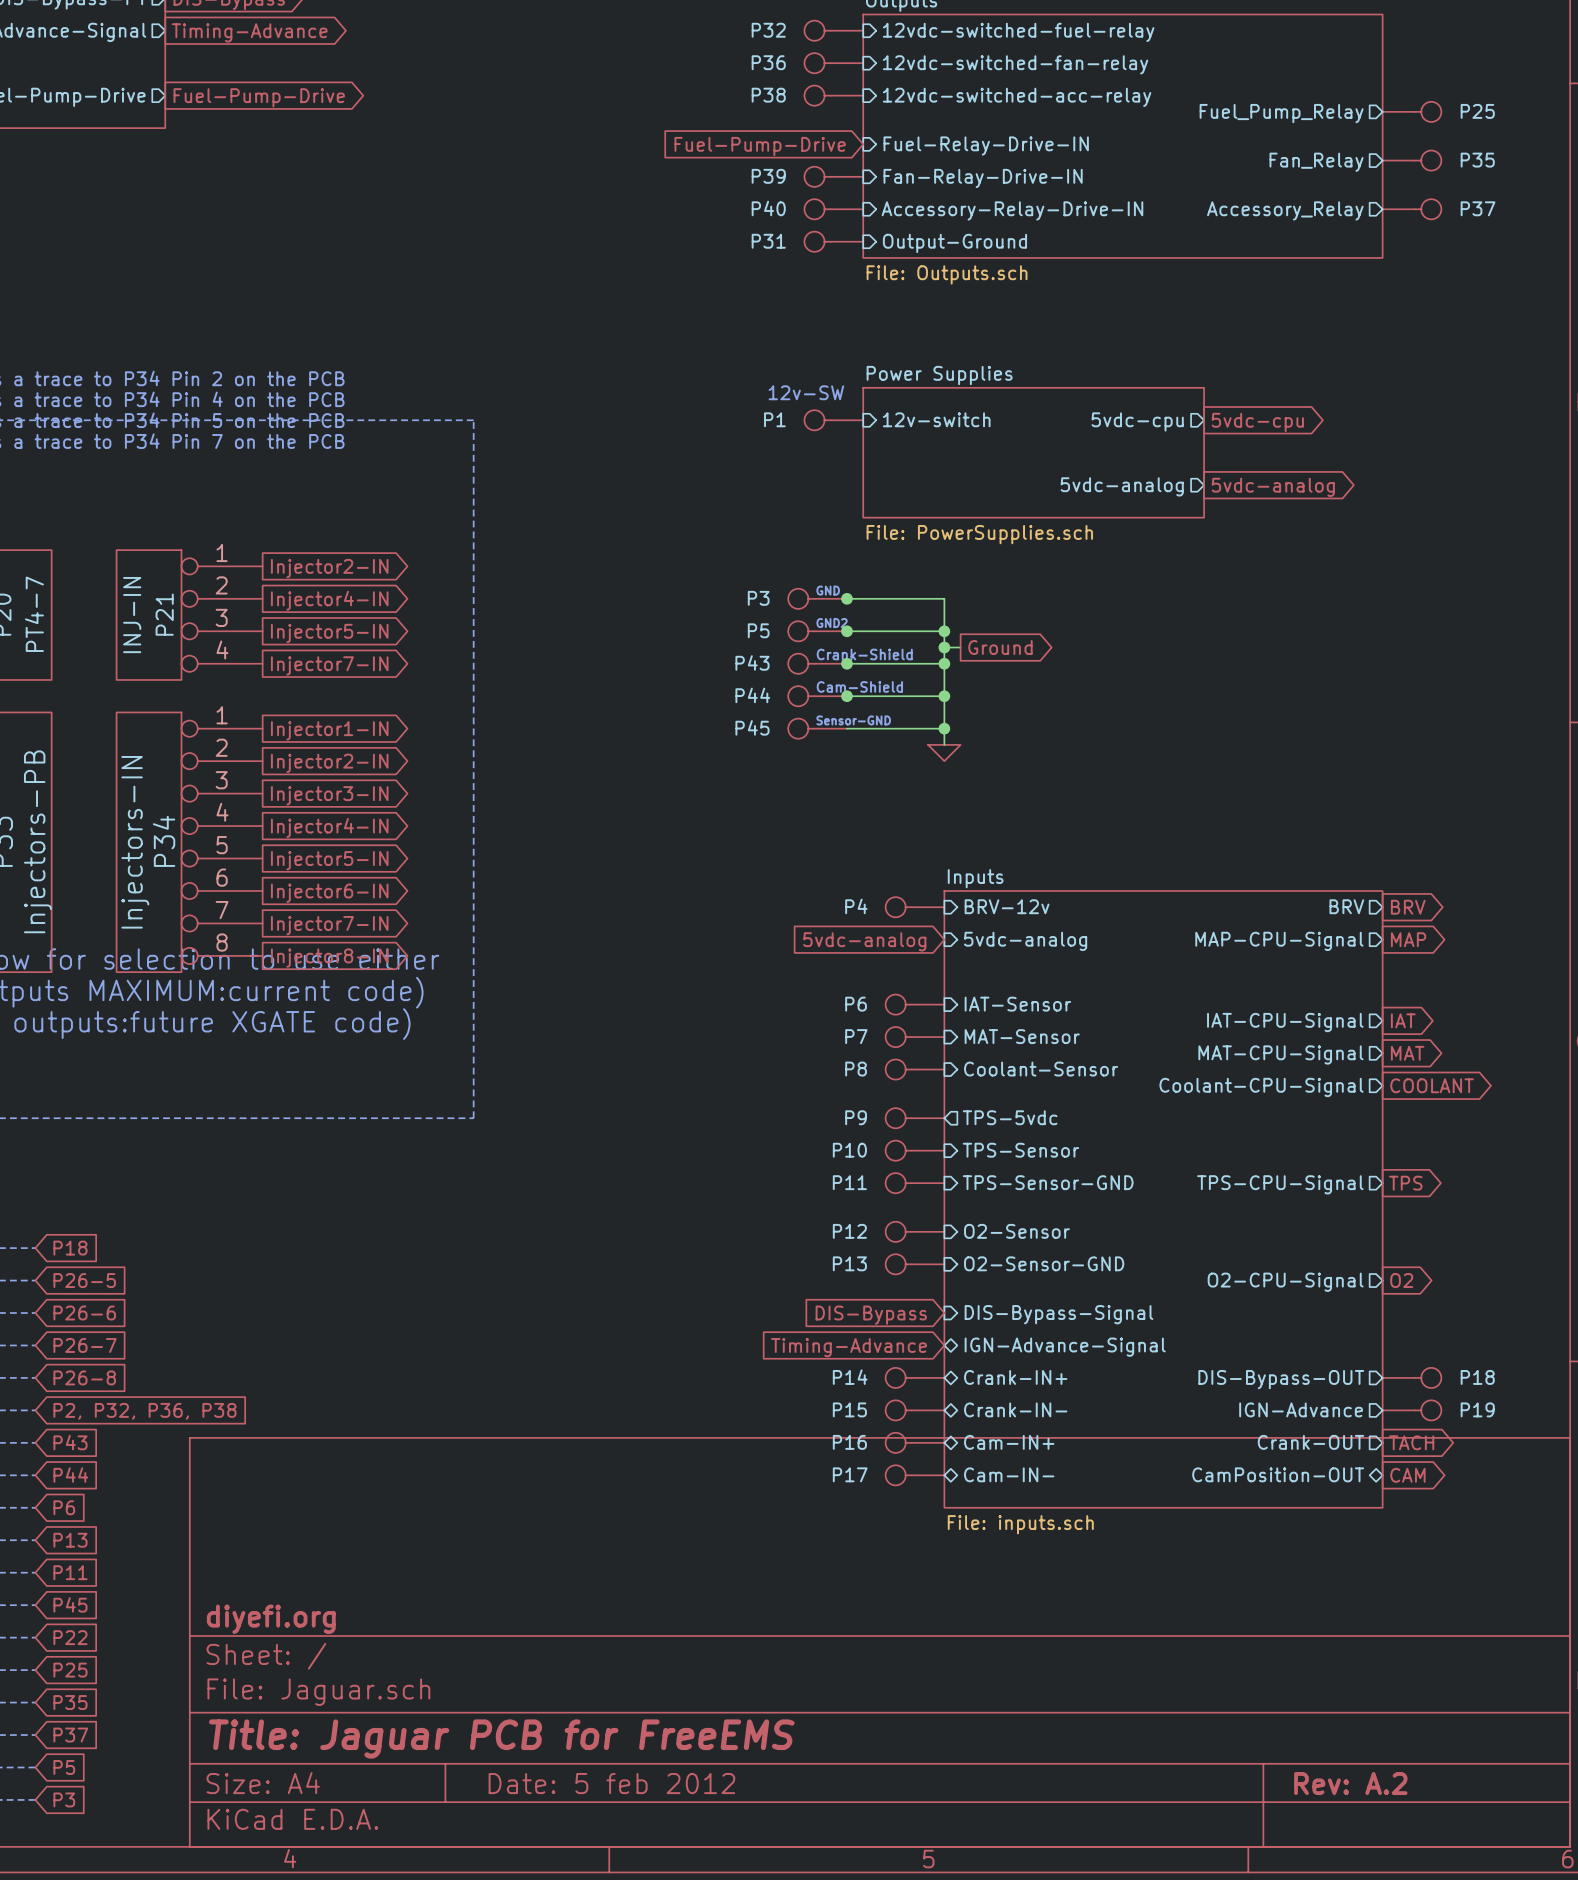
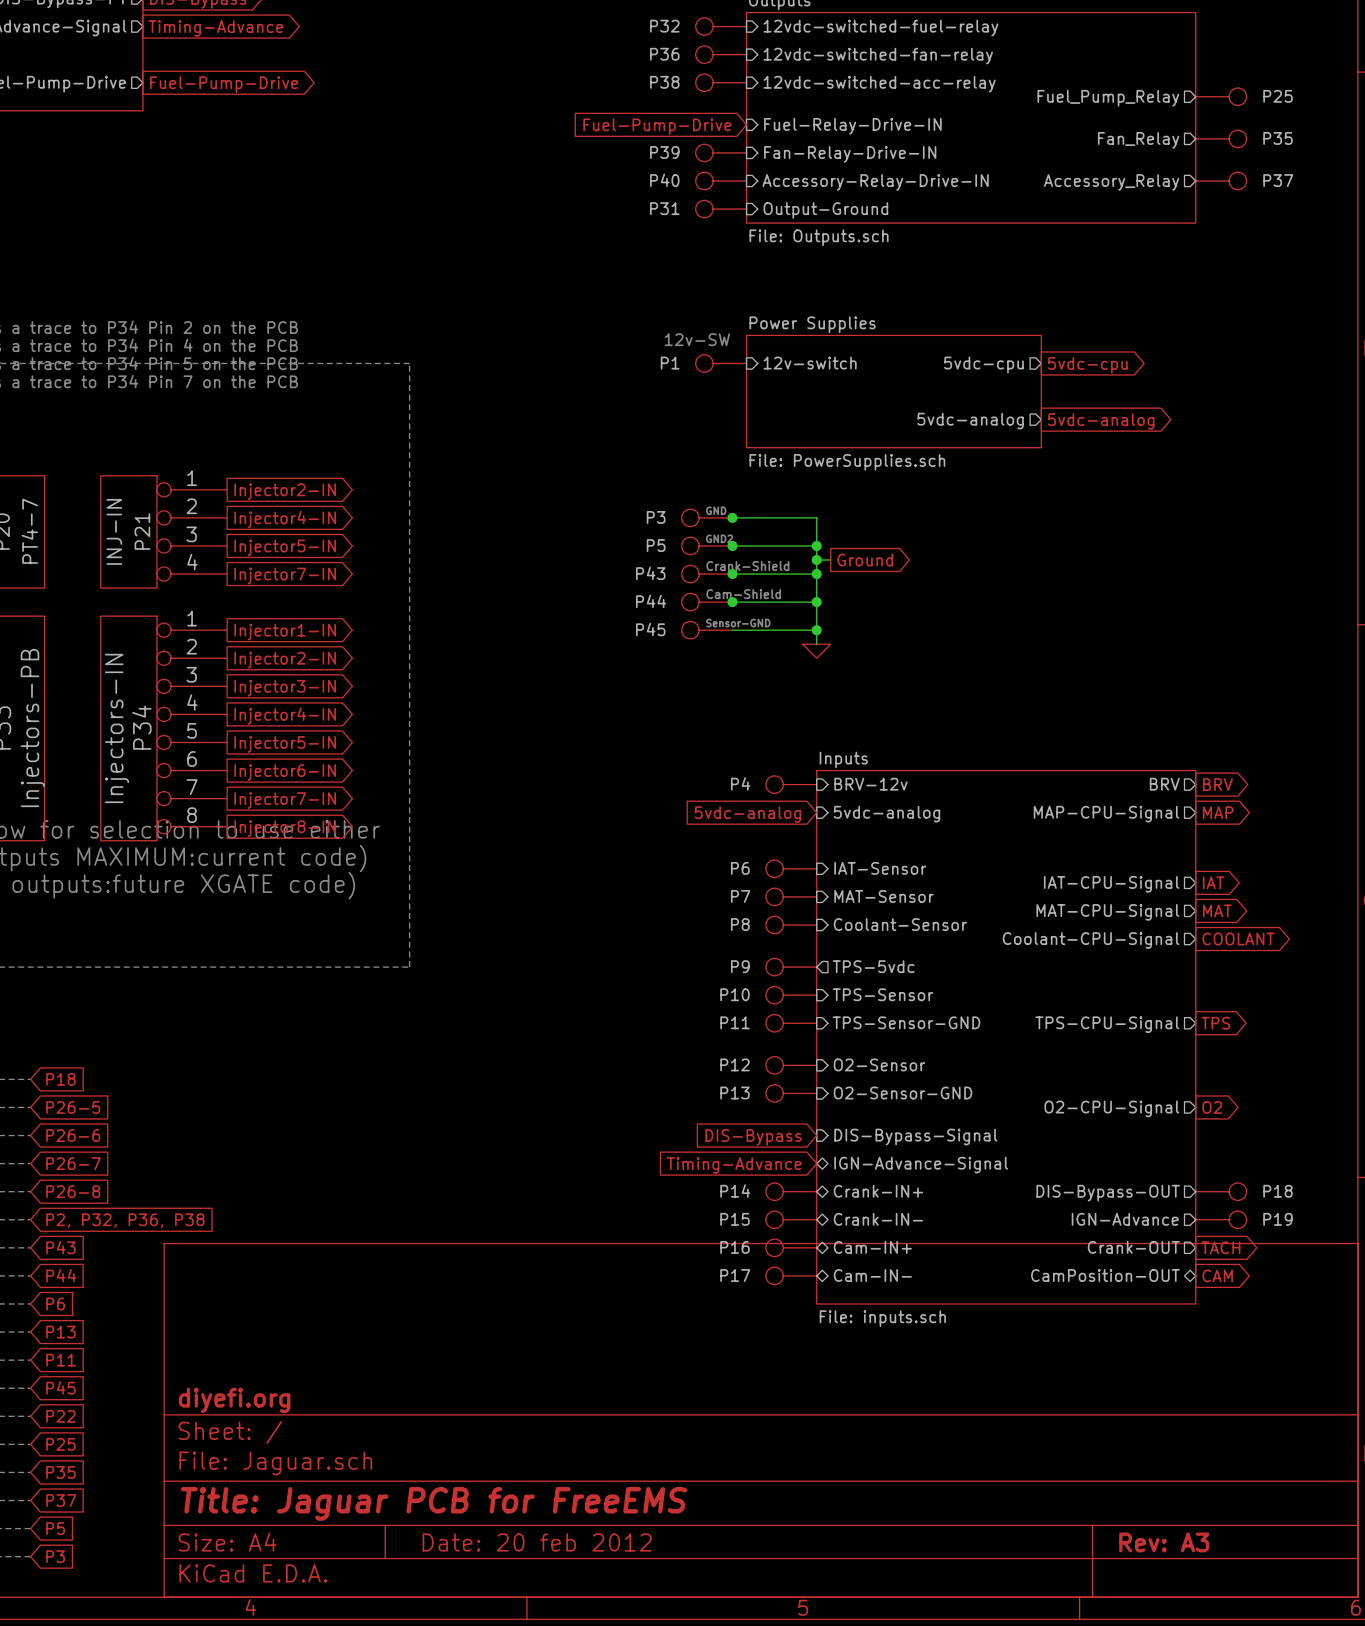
title block: Date: 5 feb 2012 (611, 1783) -> Date: 20 feb 2012 (537, 1542)
title block: Rev: A.2 (1350, 1783) -> Rev: A3 (1164, 1542)

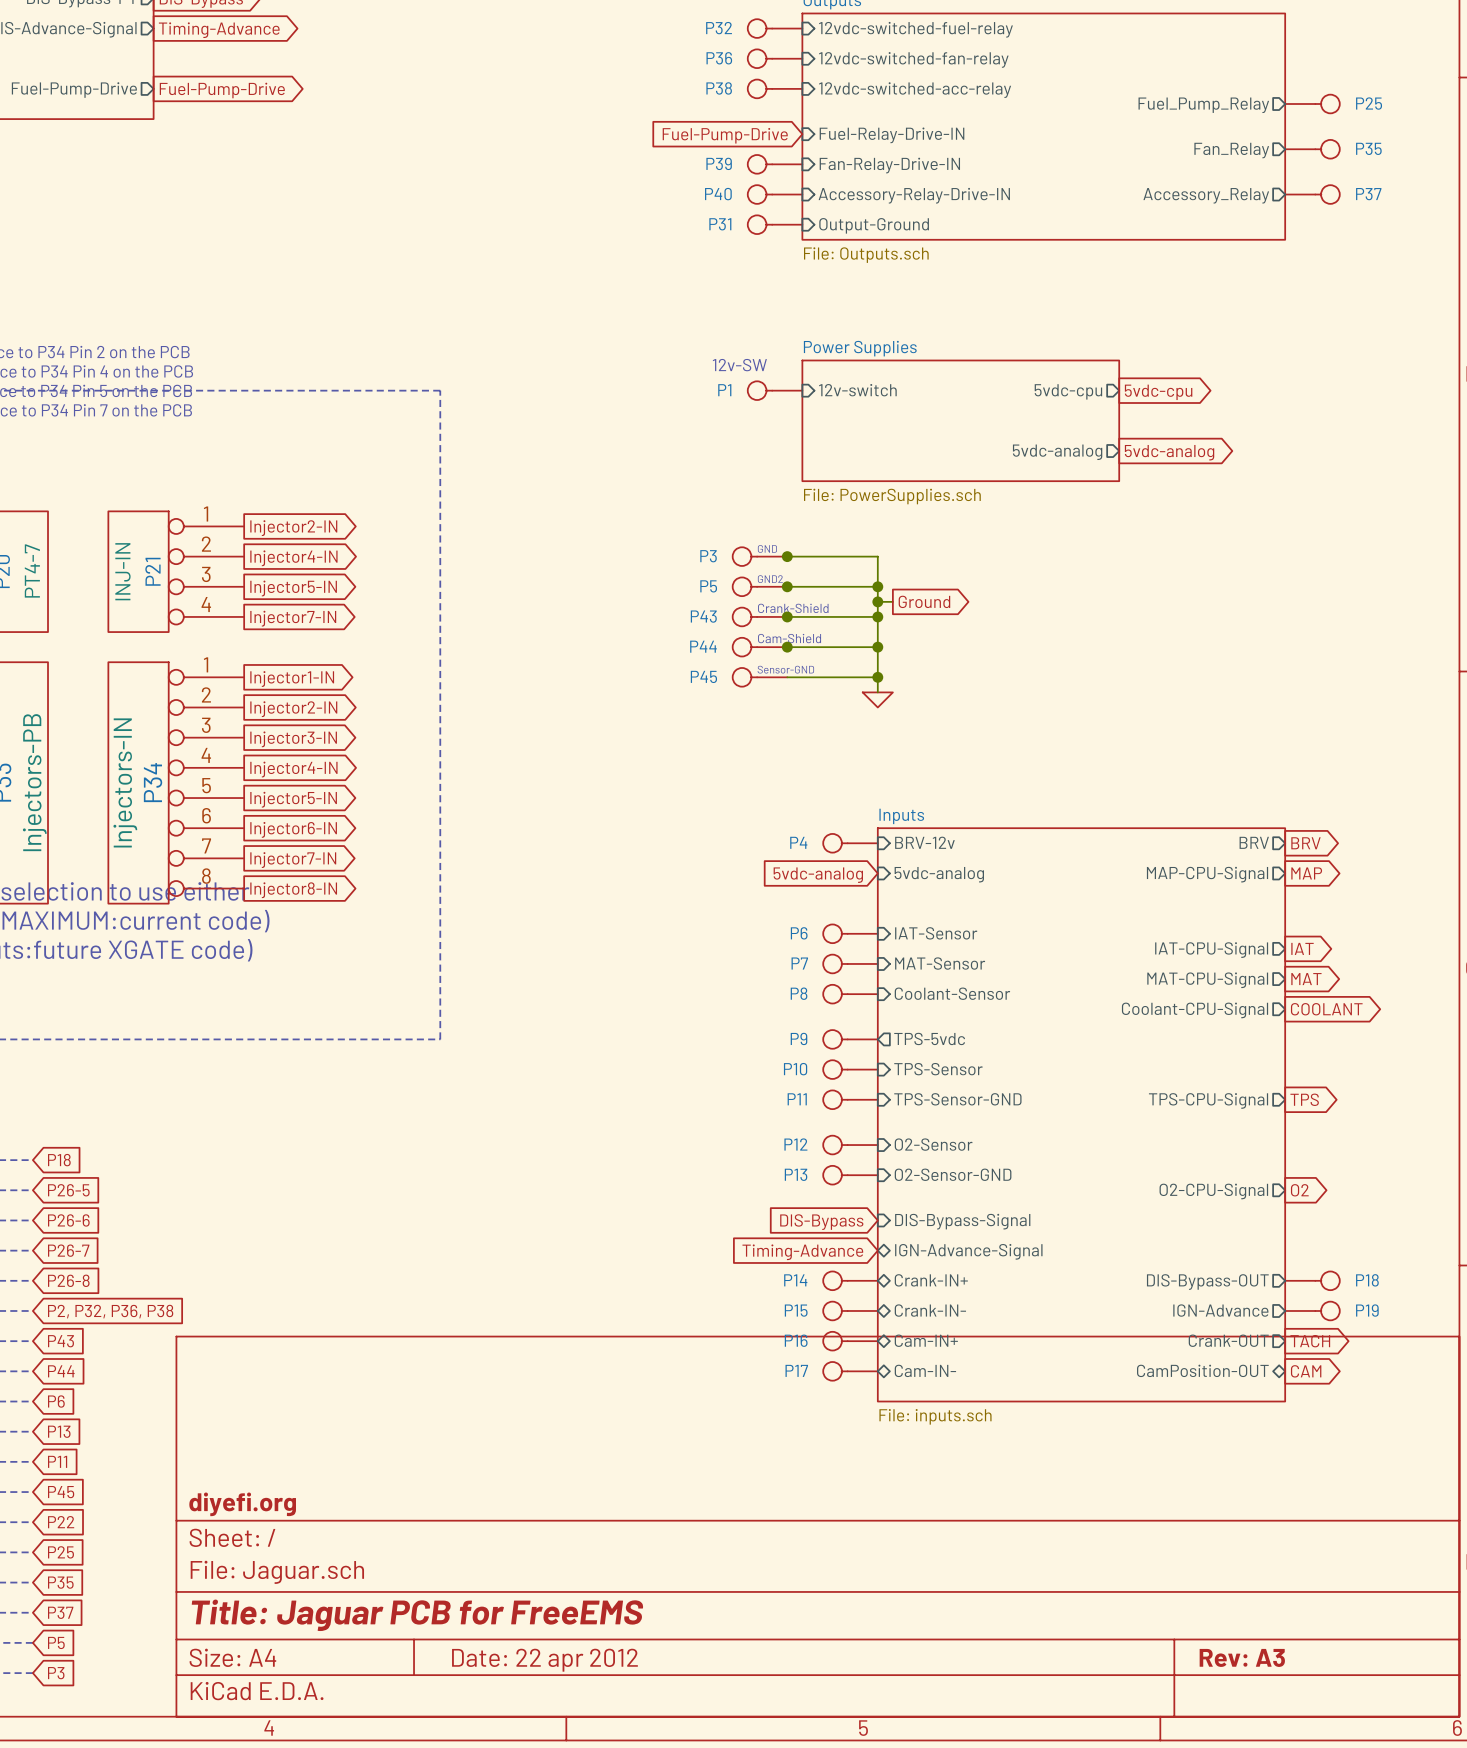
title block: Date: 20 feb 2012 (537, 1542) -> Date: 22 apr 2012 (544, 1660)

